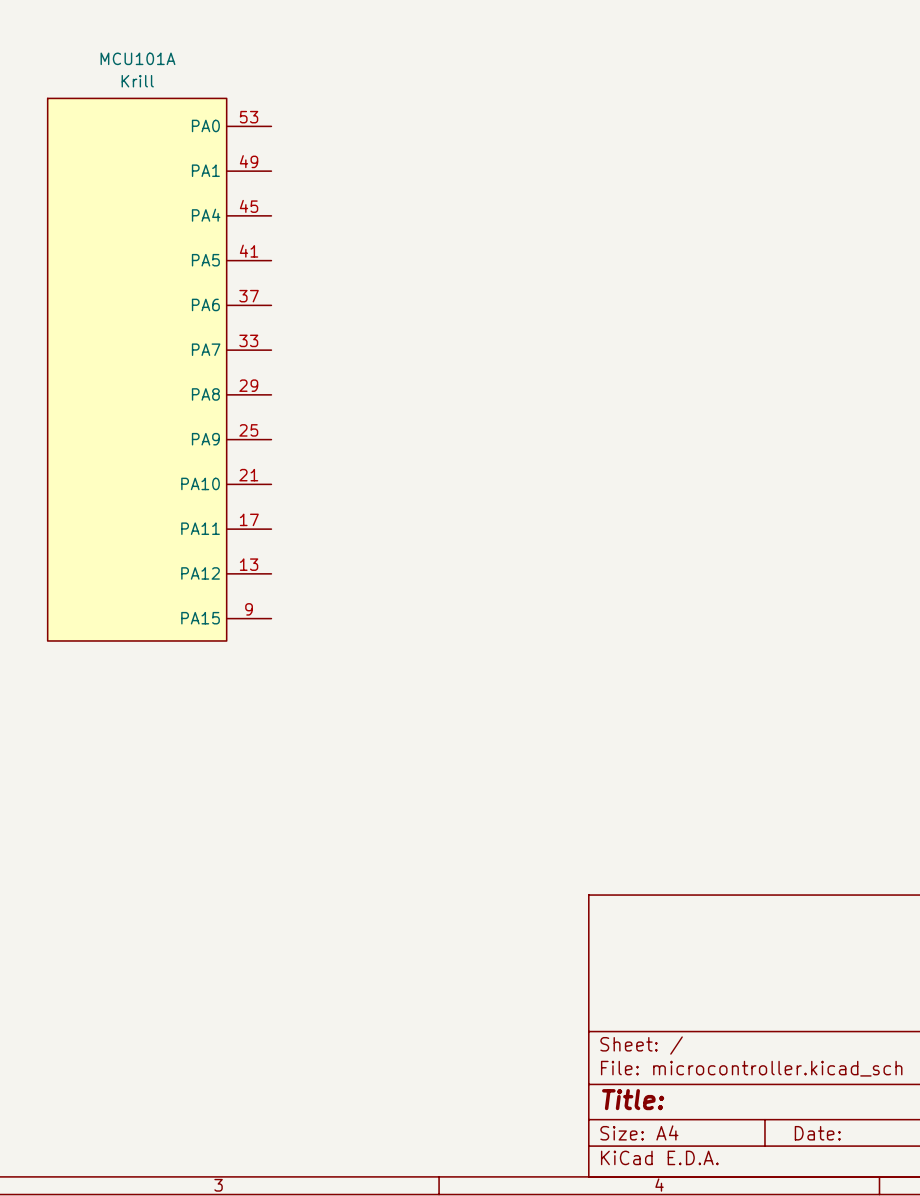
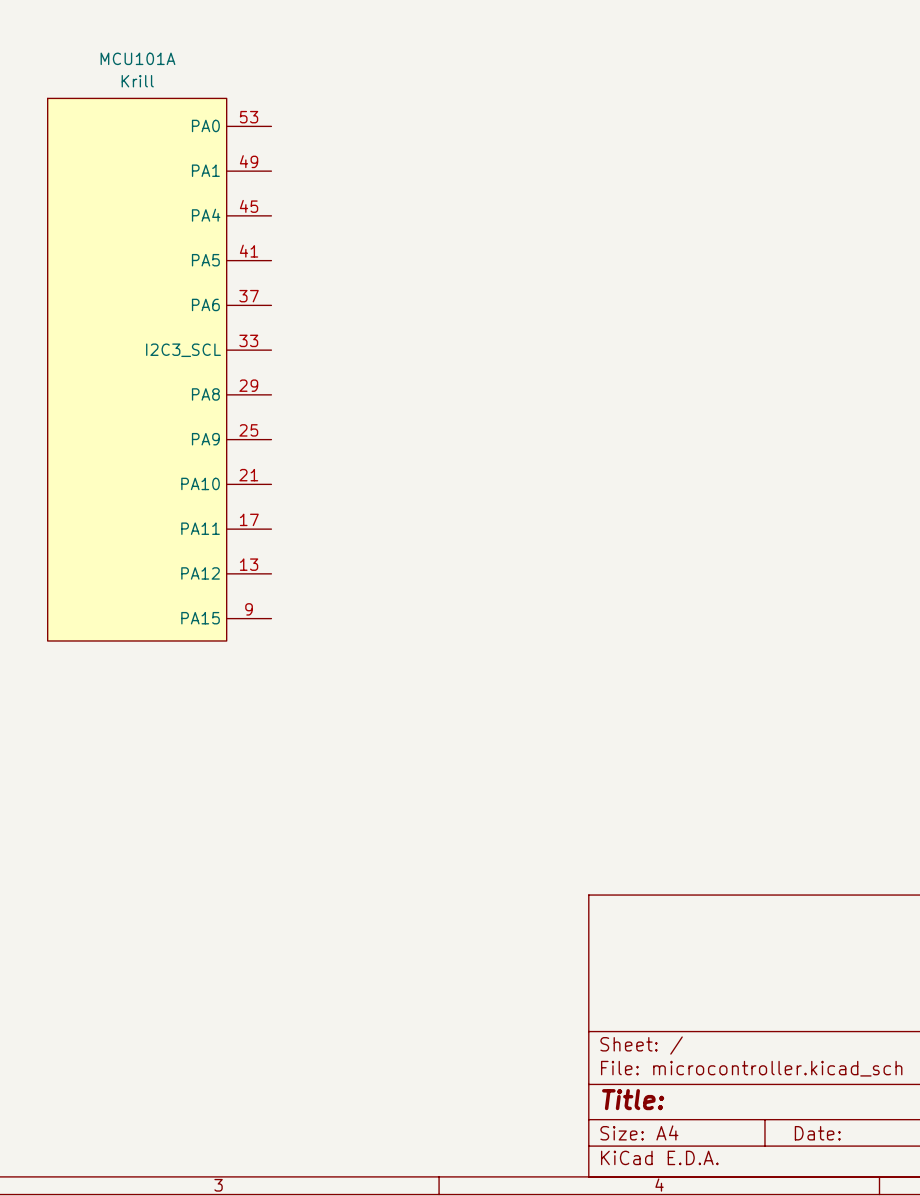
MCU101A pin name: PA7 (206, 349) -> I2C3_SCL (183, 350)

